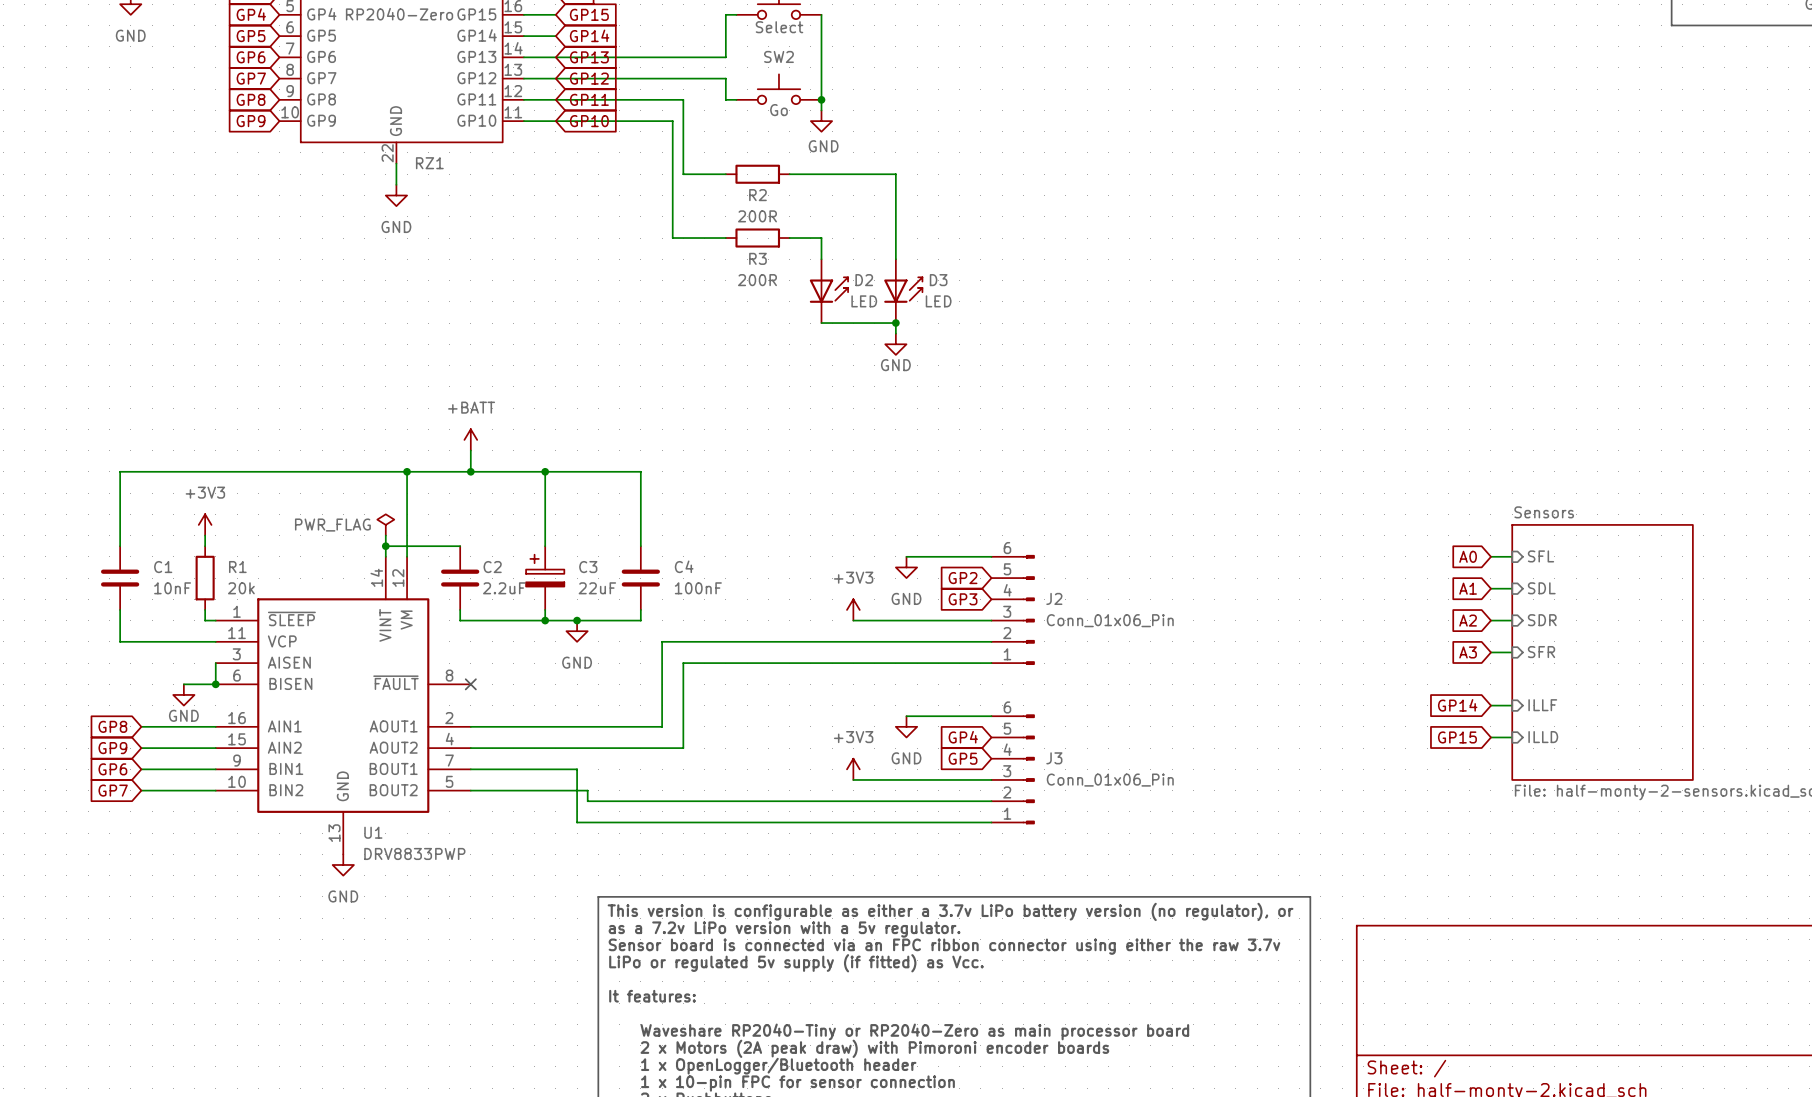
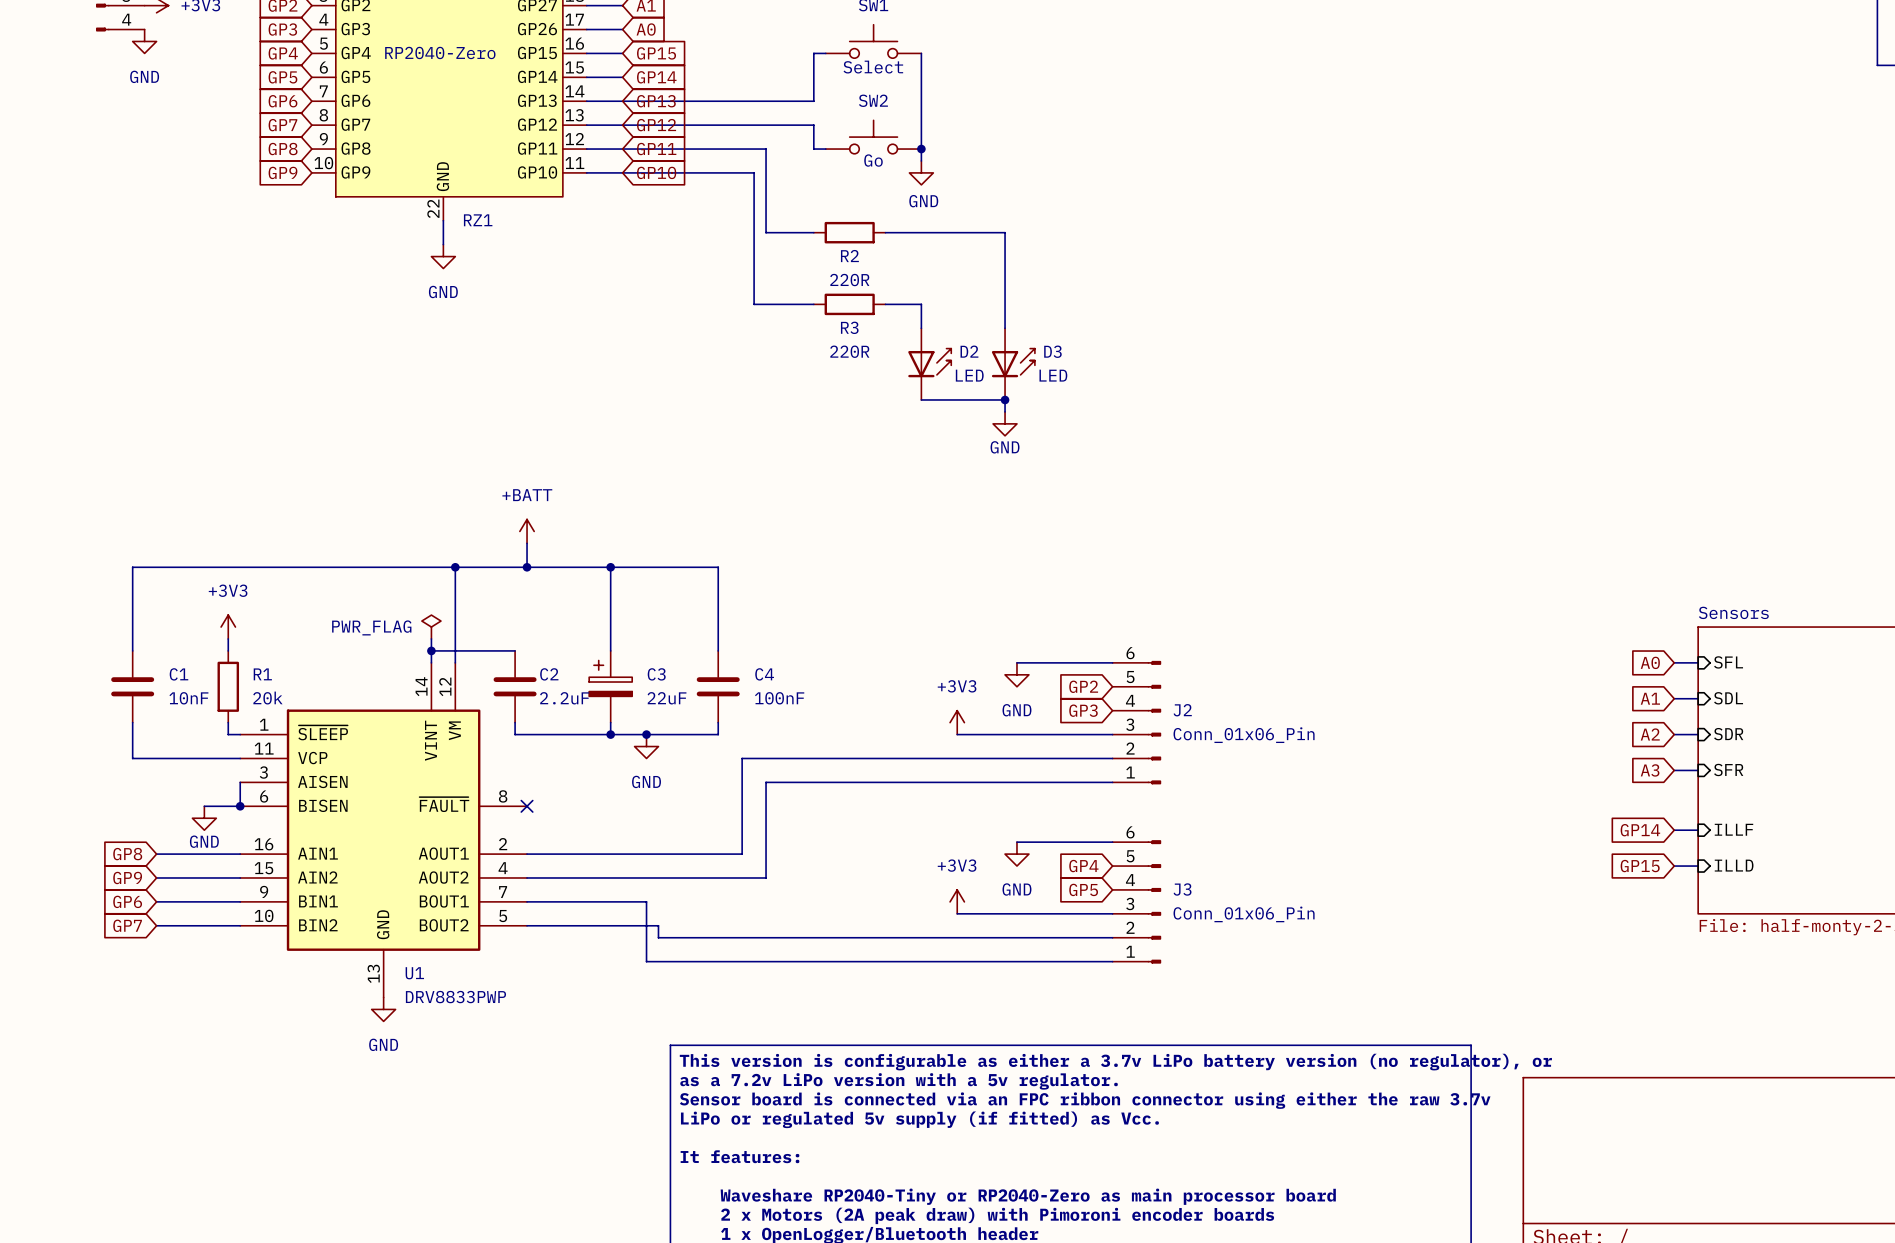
R2 value: 200R (757, 216) -> 220R (849, 280)
R3 value: 200R (757, 280) -> 220R (849, 351)

